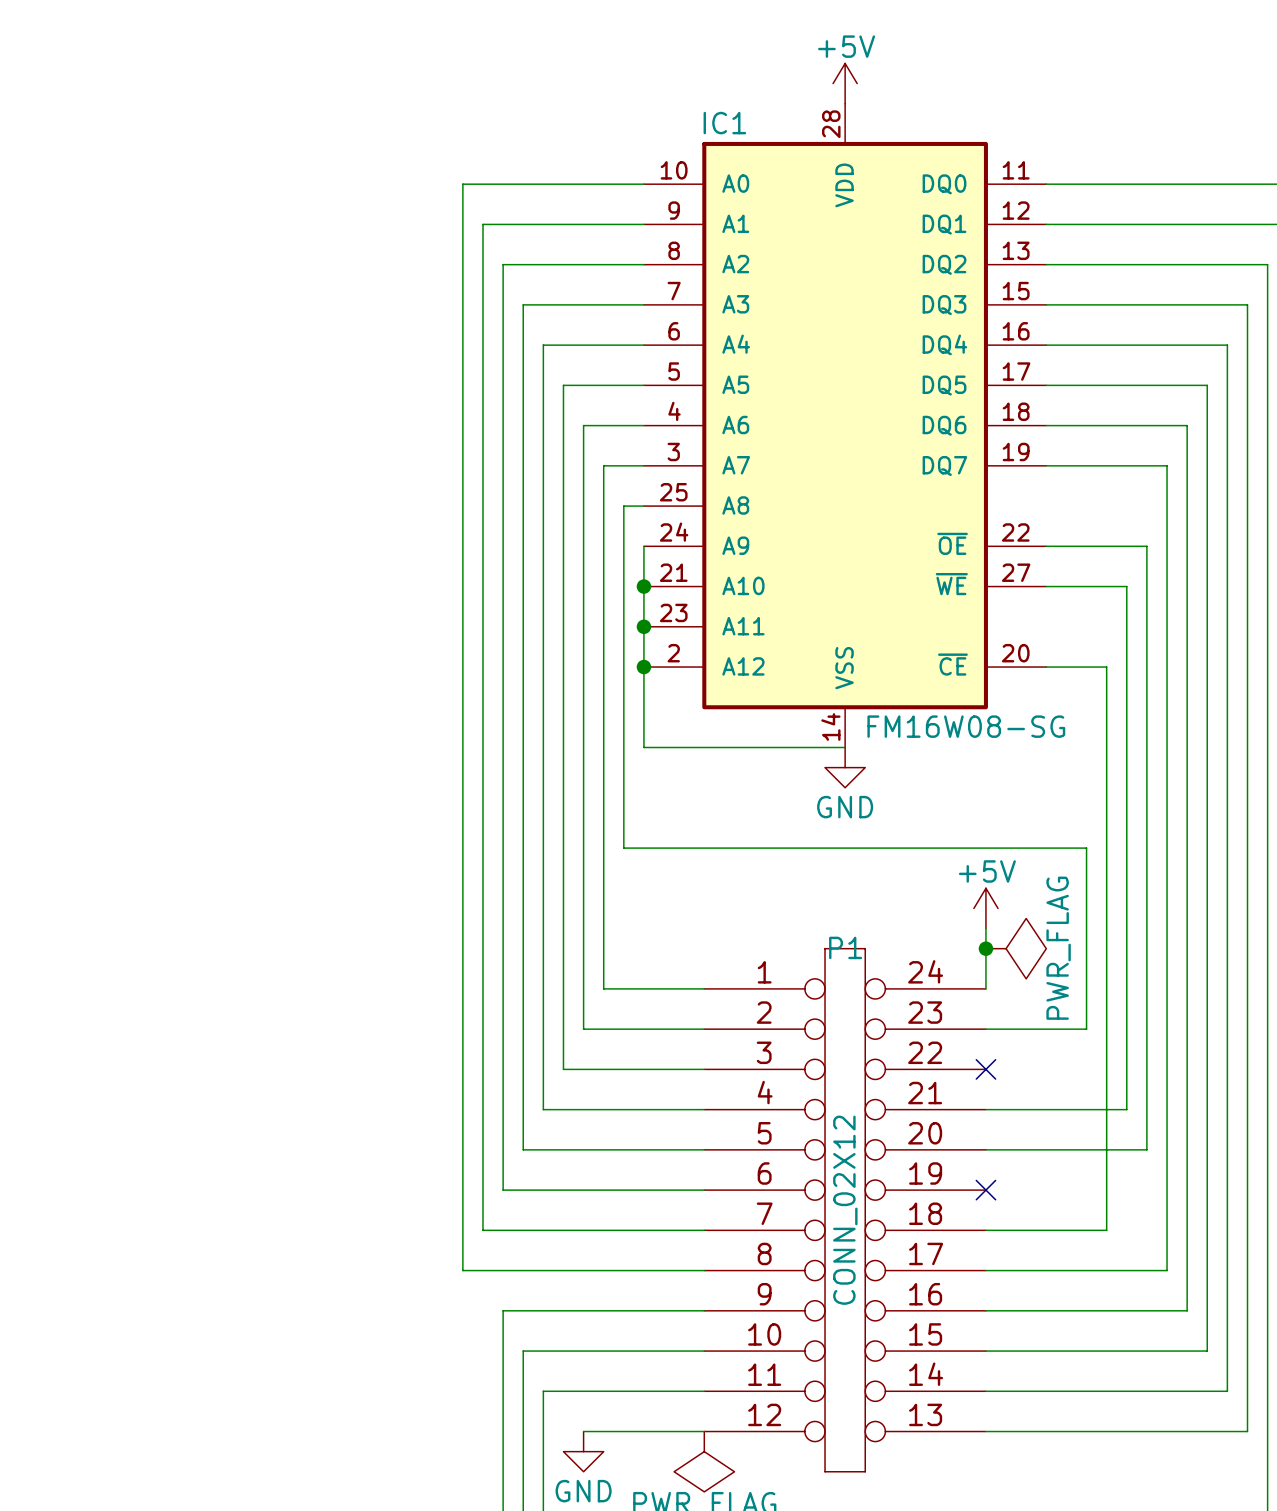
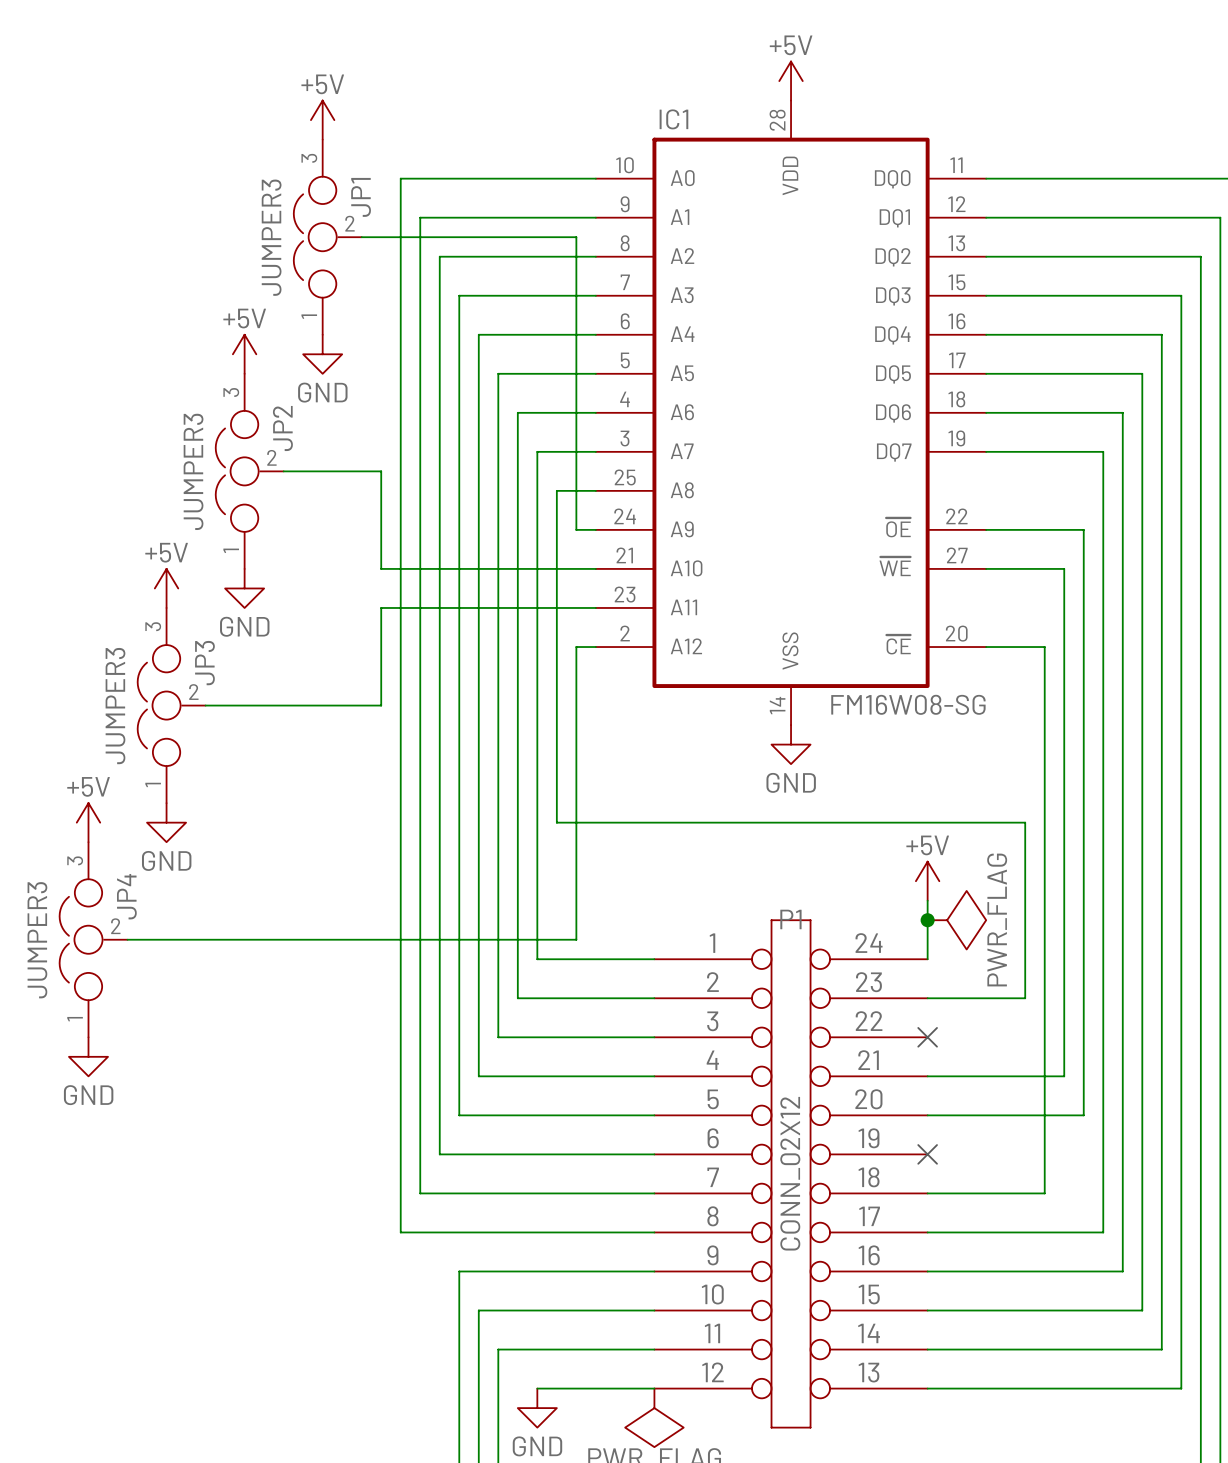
power symbol: none -> +5V (322, 120)
wire: (462, 184) (462, 224) -> (420, 178) (400, 178) (400, 1232) (420, 1232)
wire: (483, 224) (483, 264) -> (439, 217) (420, 217)
JP1: none -> JUMPER3 (327, 237)
wire: (503, 264) (503, 304) -> (459, 256) (439, 256)
wire: none -> (459, 295) (478, 295)
wire: (523, 304) (523, 345) -> (498, 334) (478, 334)
wire: (543, 345) (543, 385) -> (517, 373) (498, 373)
power symbol: none -> +5V (244, 354)
power symbol: none -> GND (322, 354)
wire: (563, 385) (563, 425) -> (537, 412) (517, 412)
wire: (583, 425) (583, 465) -> (556, 451) (537, 451)
wire: (603, 465) (603, 506) -> (361, 237) (576, 237) (576, 490) (556, 490)
JP2: none -> JUMPER3 (249, 471)
wire: none -> (283, 471) (381, 471) (381, 568) (595, 568)
wire: (623, 546) (623, 667) -> (576, 529) (595, 529)
wire: (643, 546) (643, 747) (845, 747) -> none
junction: (643, 586) -> none
power symbol: none -> +5V (166, 588)
power symbol: none -> GND (244, 588)
wire: none -> (595, 607) (381, 607) (381, 705) (205, 705)
junction: (643, 626) -> none
wire: none -> (576, 647) (595, 647)
junction: (643, 667) -> none
JP3: none -> JUMPER3 (171, 705)
power symbol: none -> +5V (88, 822)
power symbol: none -> GND (166, 822)
wire: (603, 848) (603, 988) -> (537, 959) (556, 959)
wire: none -> (556, 822) (576, 822) (576, 939) (127, 939)
JP4: none -> JUMPER3 (93, 939)
wire: (583, 988) (583, 1029) -> (517, 998) (537, 998)
wire: (563, 1029) (563, 1069) -> (498, 1037) (517, 1037)
wire: (543, 1069) (543, 1109) -> (478, 1076) (498, 1076)
power symbol: none -> GND (88, 1056)
wire: (523, 1109) (523, 1149) -> none
wire: (503, 1149) (503, 1190) -> (459, 1115) (478, 1115)
wire: (483, 1190) (483, 1230) -> (439, 1154) (459, 1154)
wire: (462, 1230) (462, 1270) -> (420, 1193) (439, 1193)

